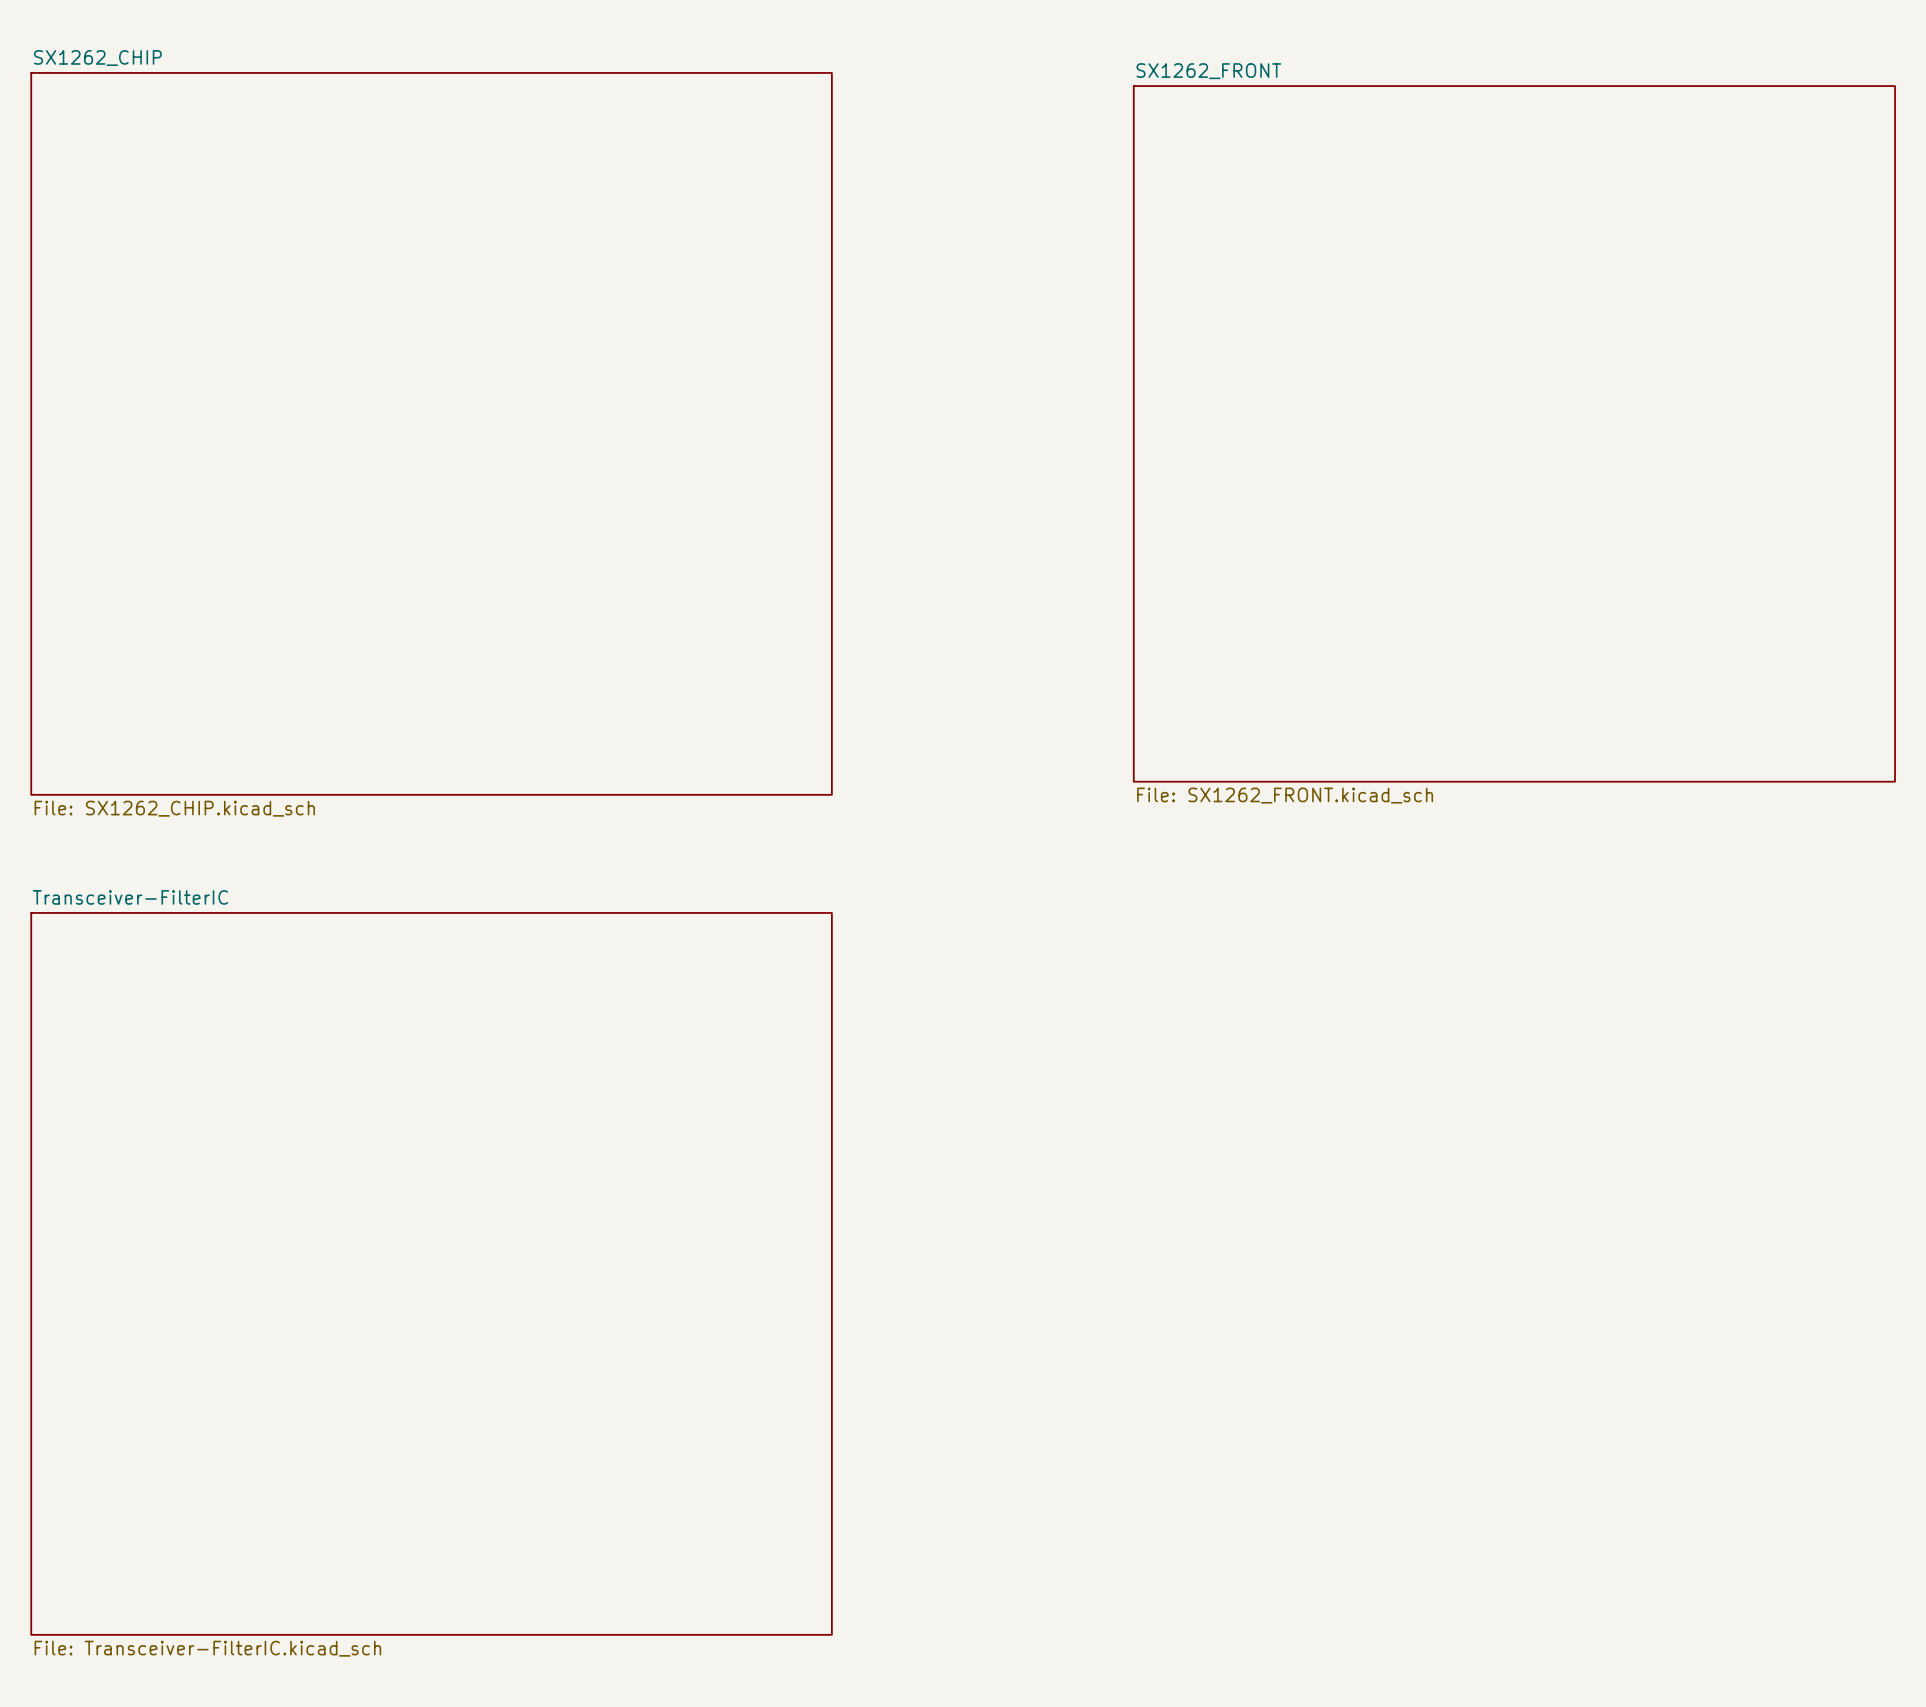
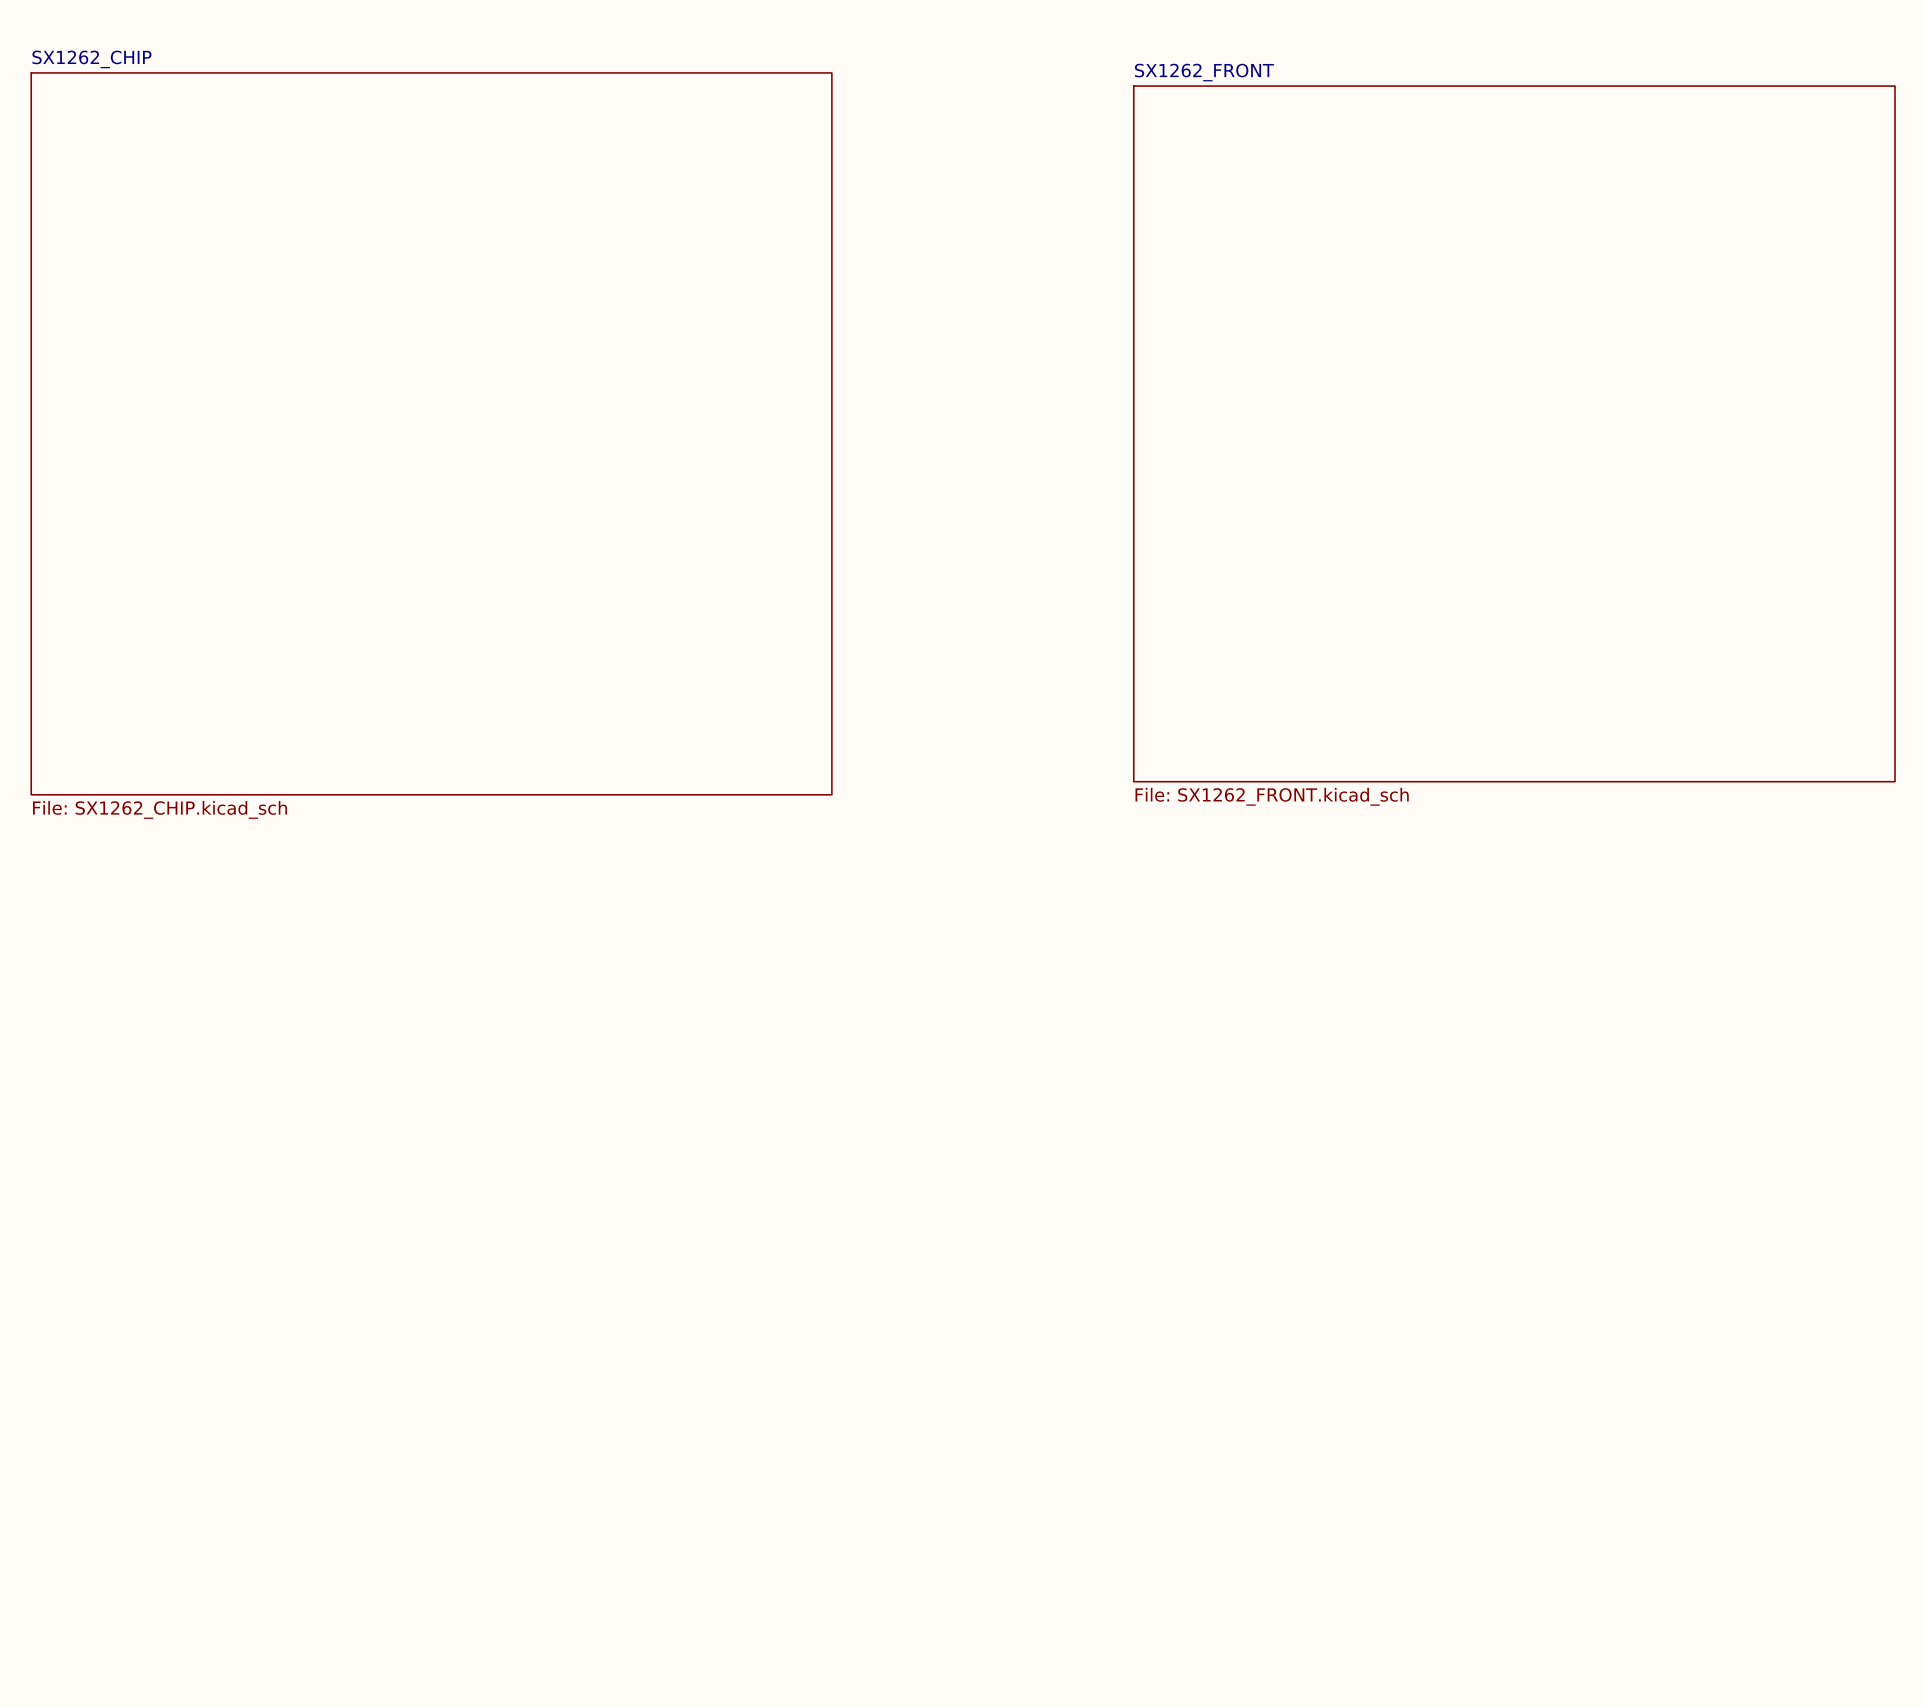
sheet Transceiver-FilterIC: File: Transceiver-FilterIC.kicad_sch (431, 1273) -> none

